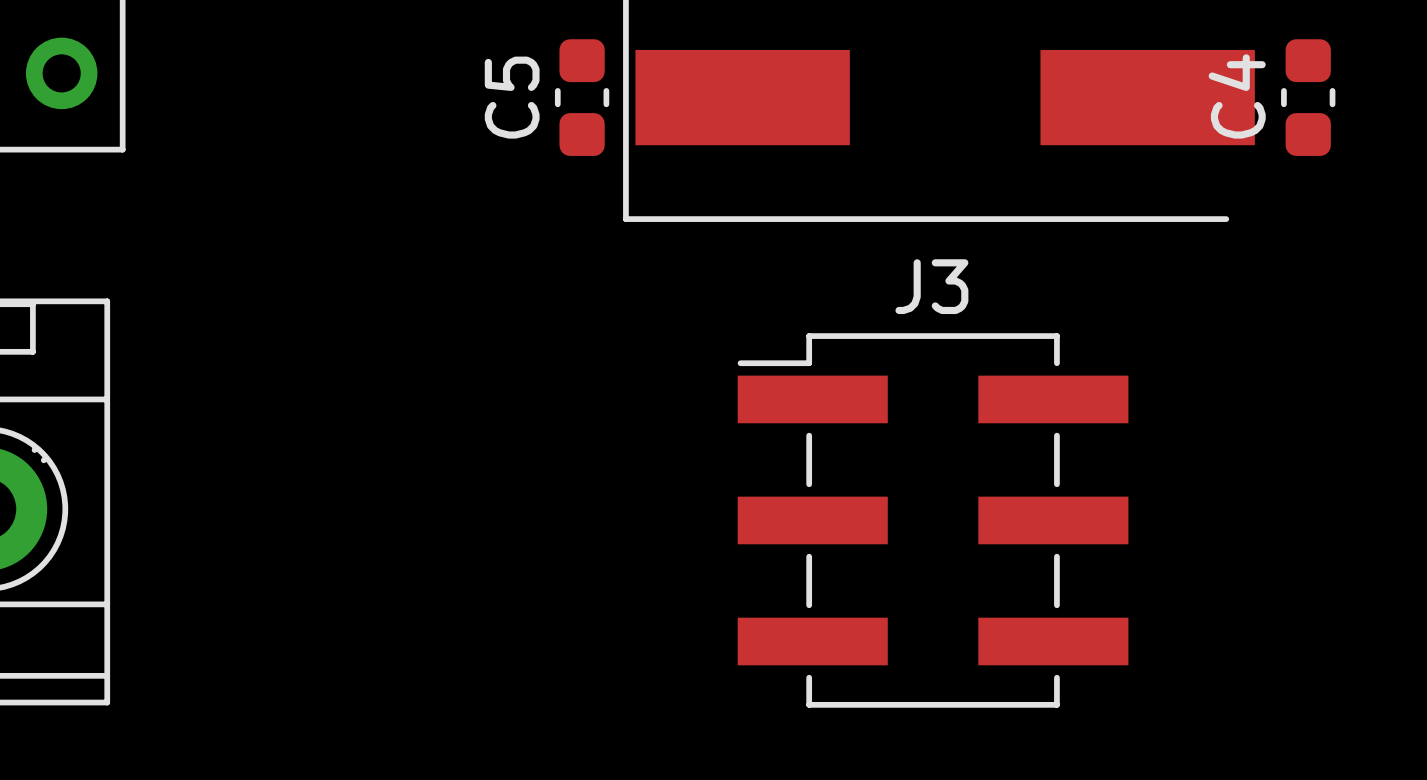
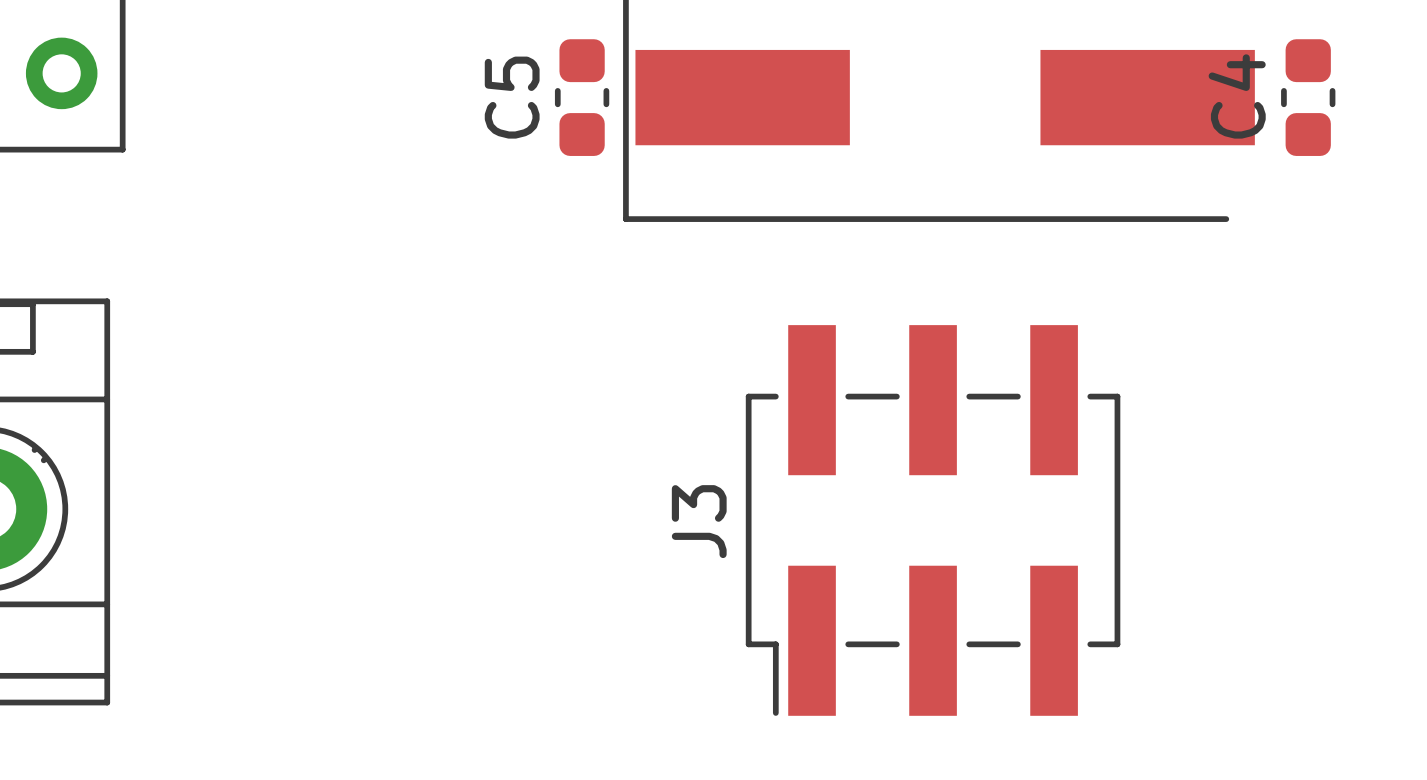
J3 rotation: 0° (933, 520) -> 90° counterclockwise (933, 520)

